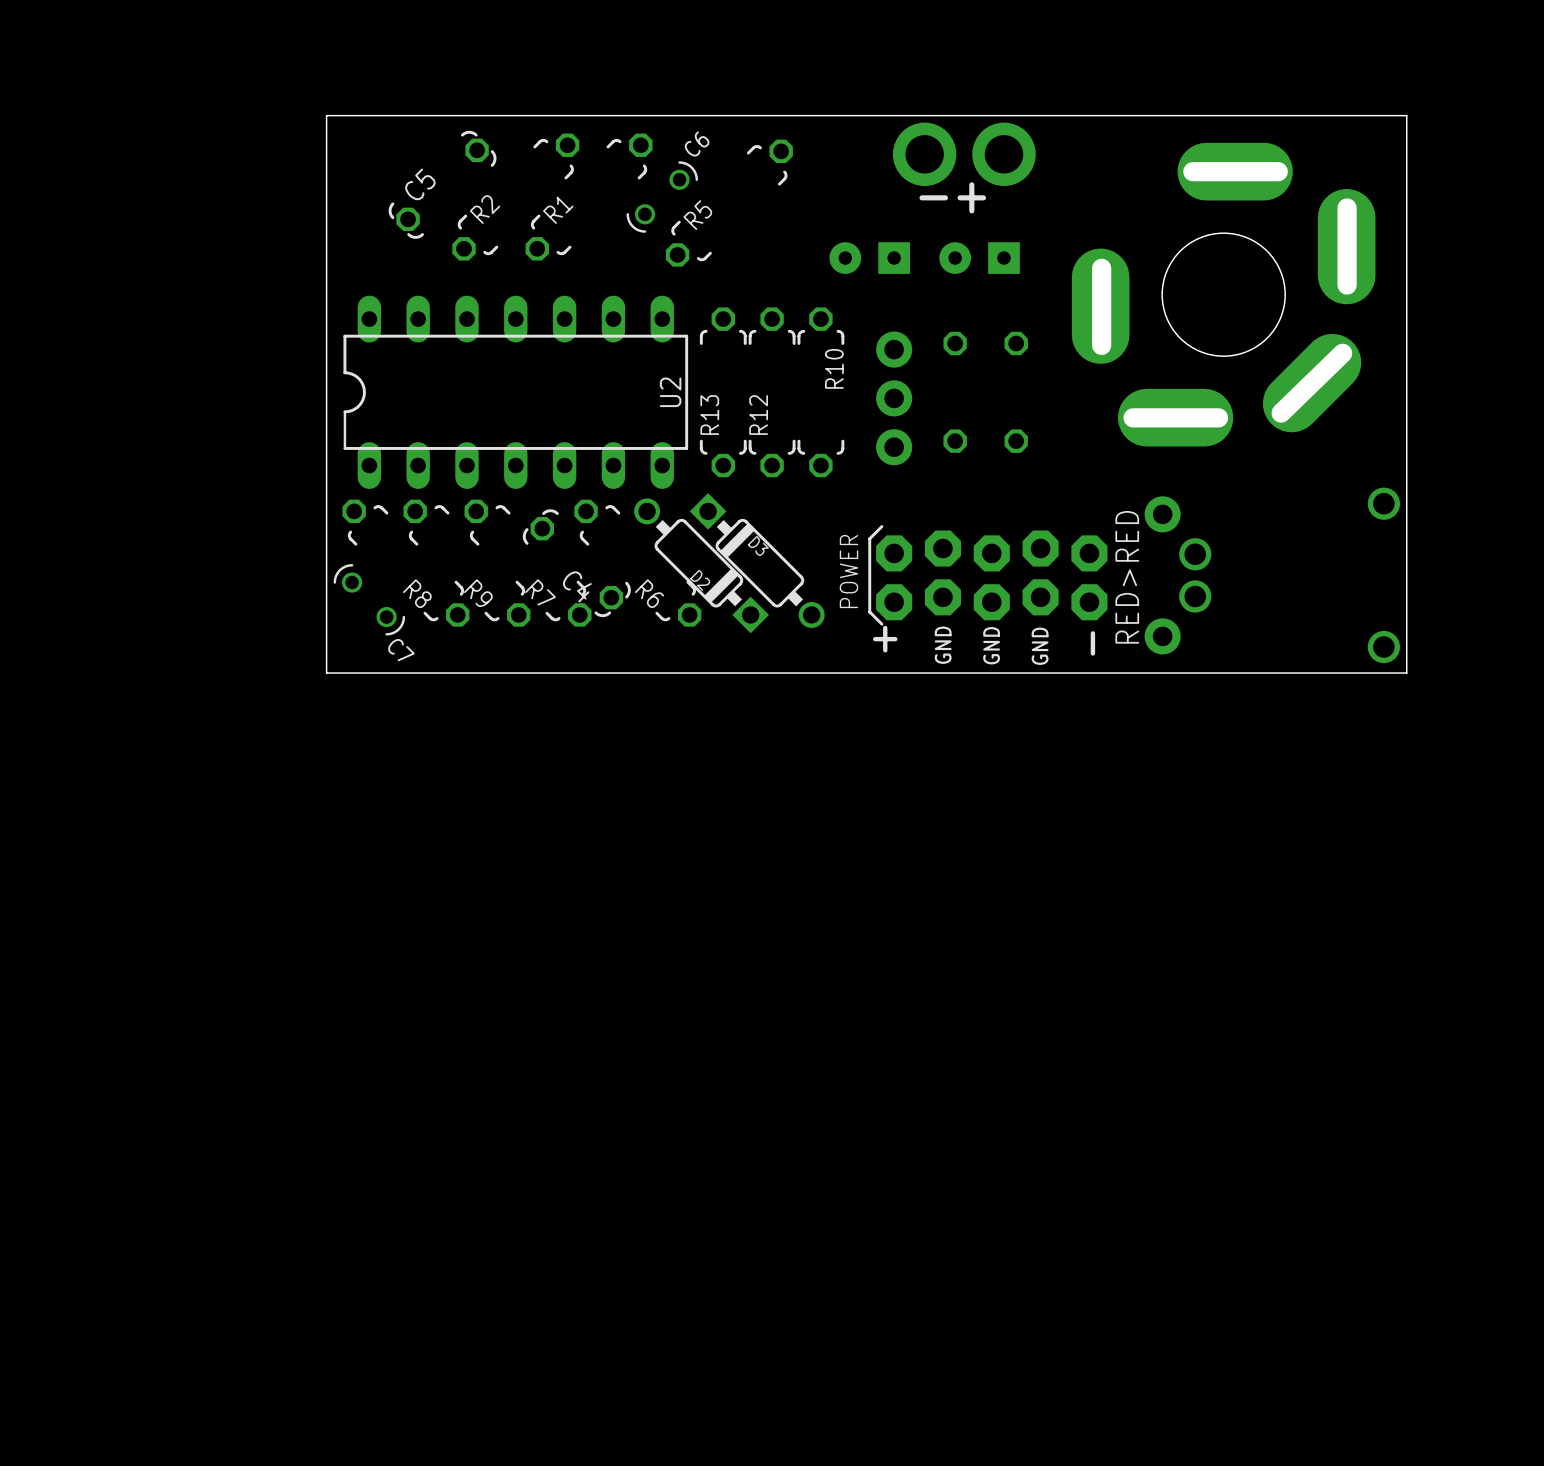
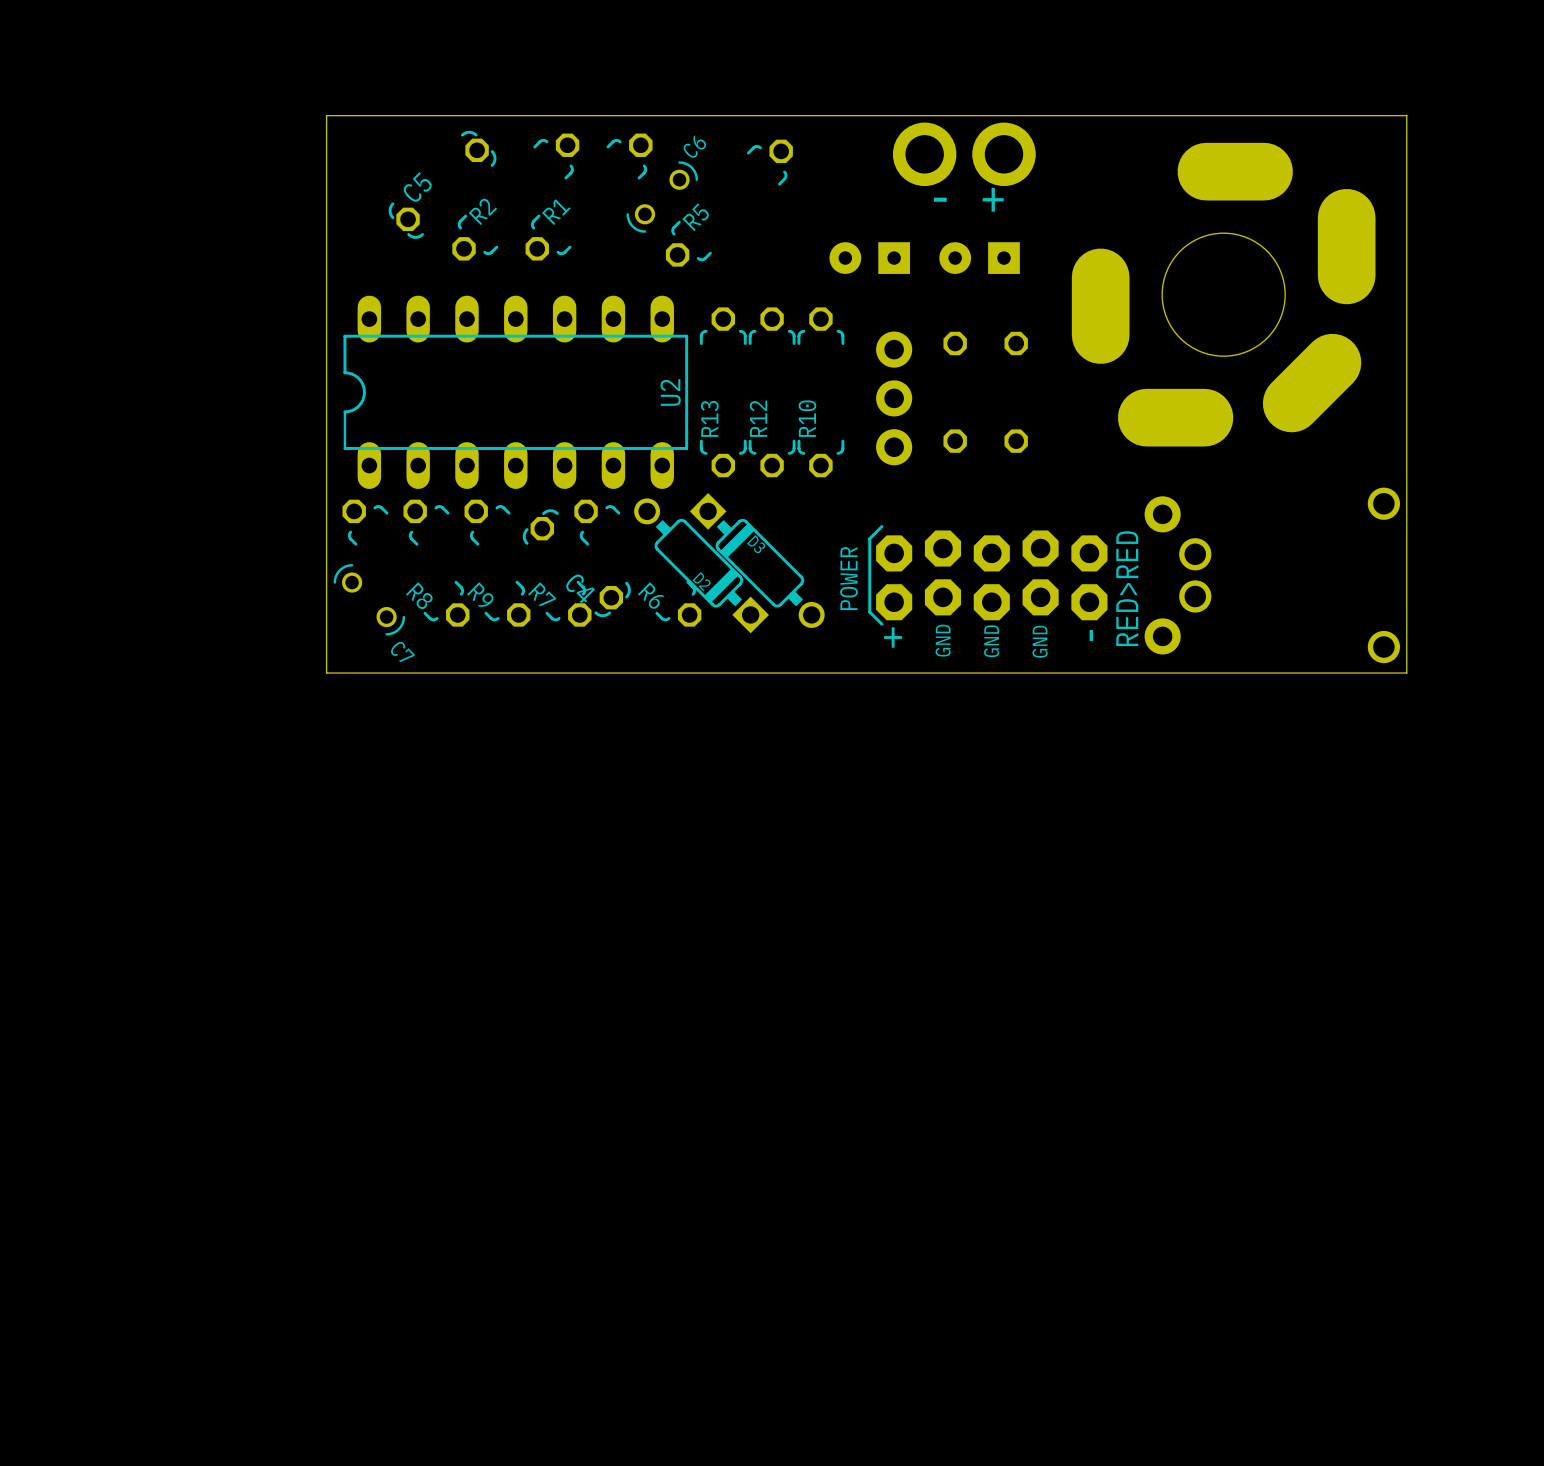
text: +- (952, 197) -> + - (968, 199)
R10 name position: R10 (834, 368) -> R10 (807, 418)

